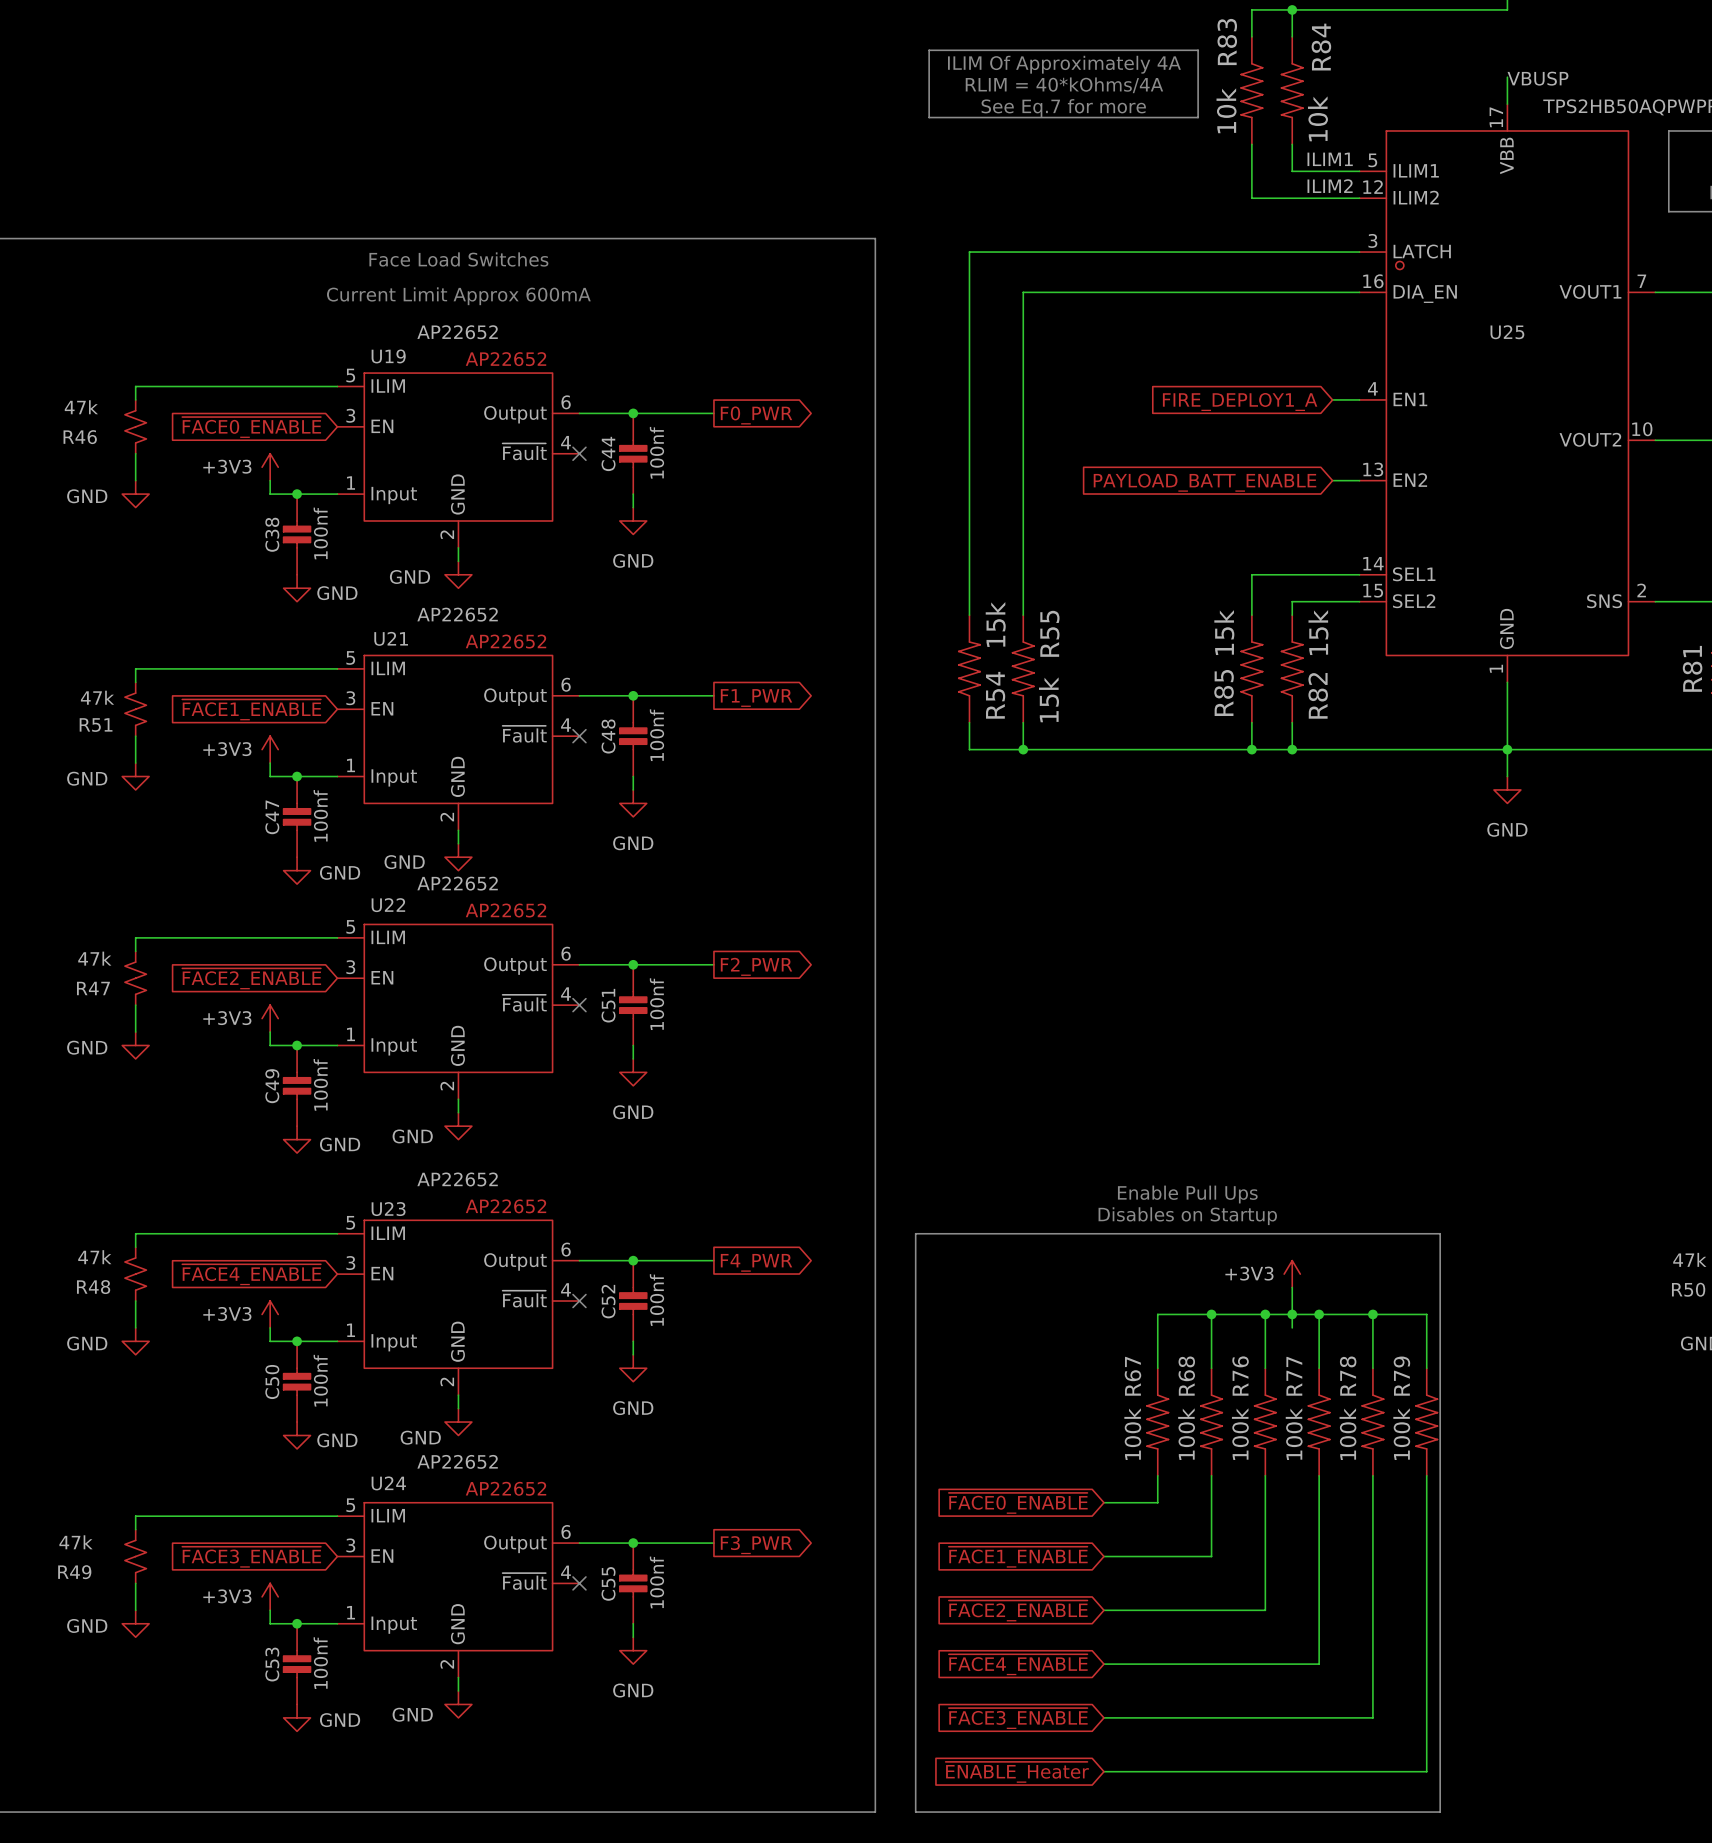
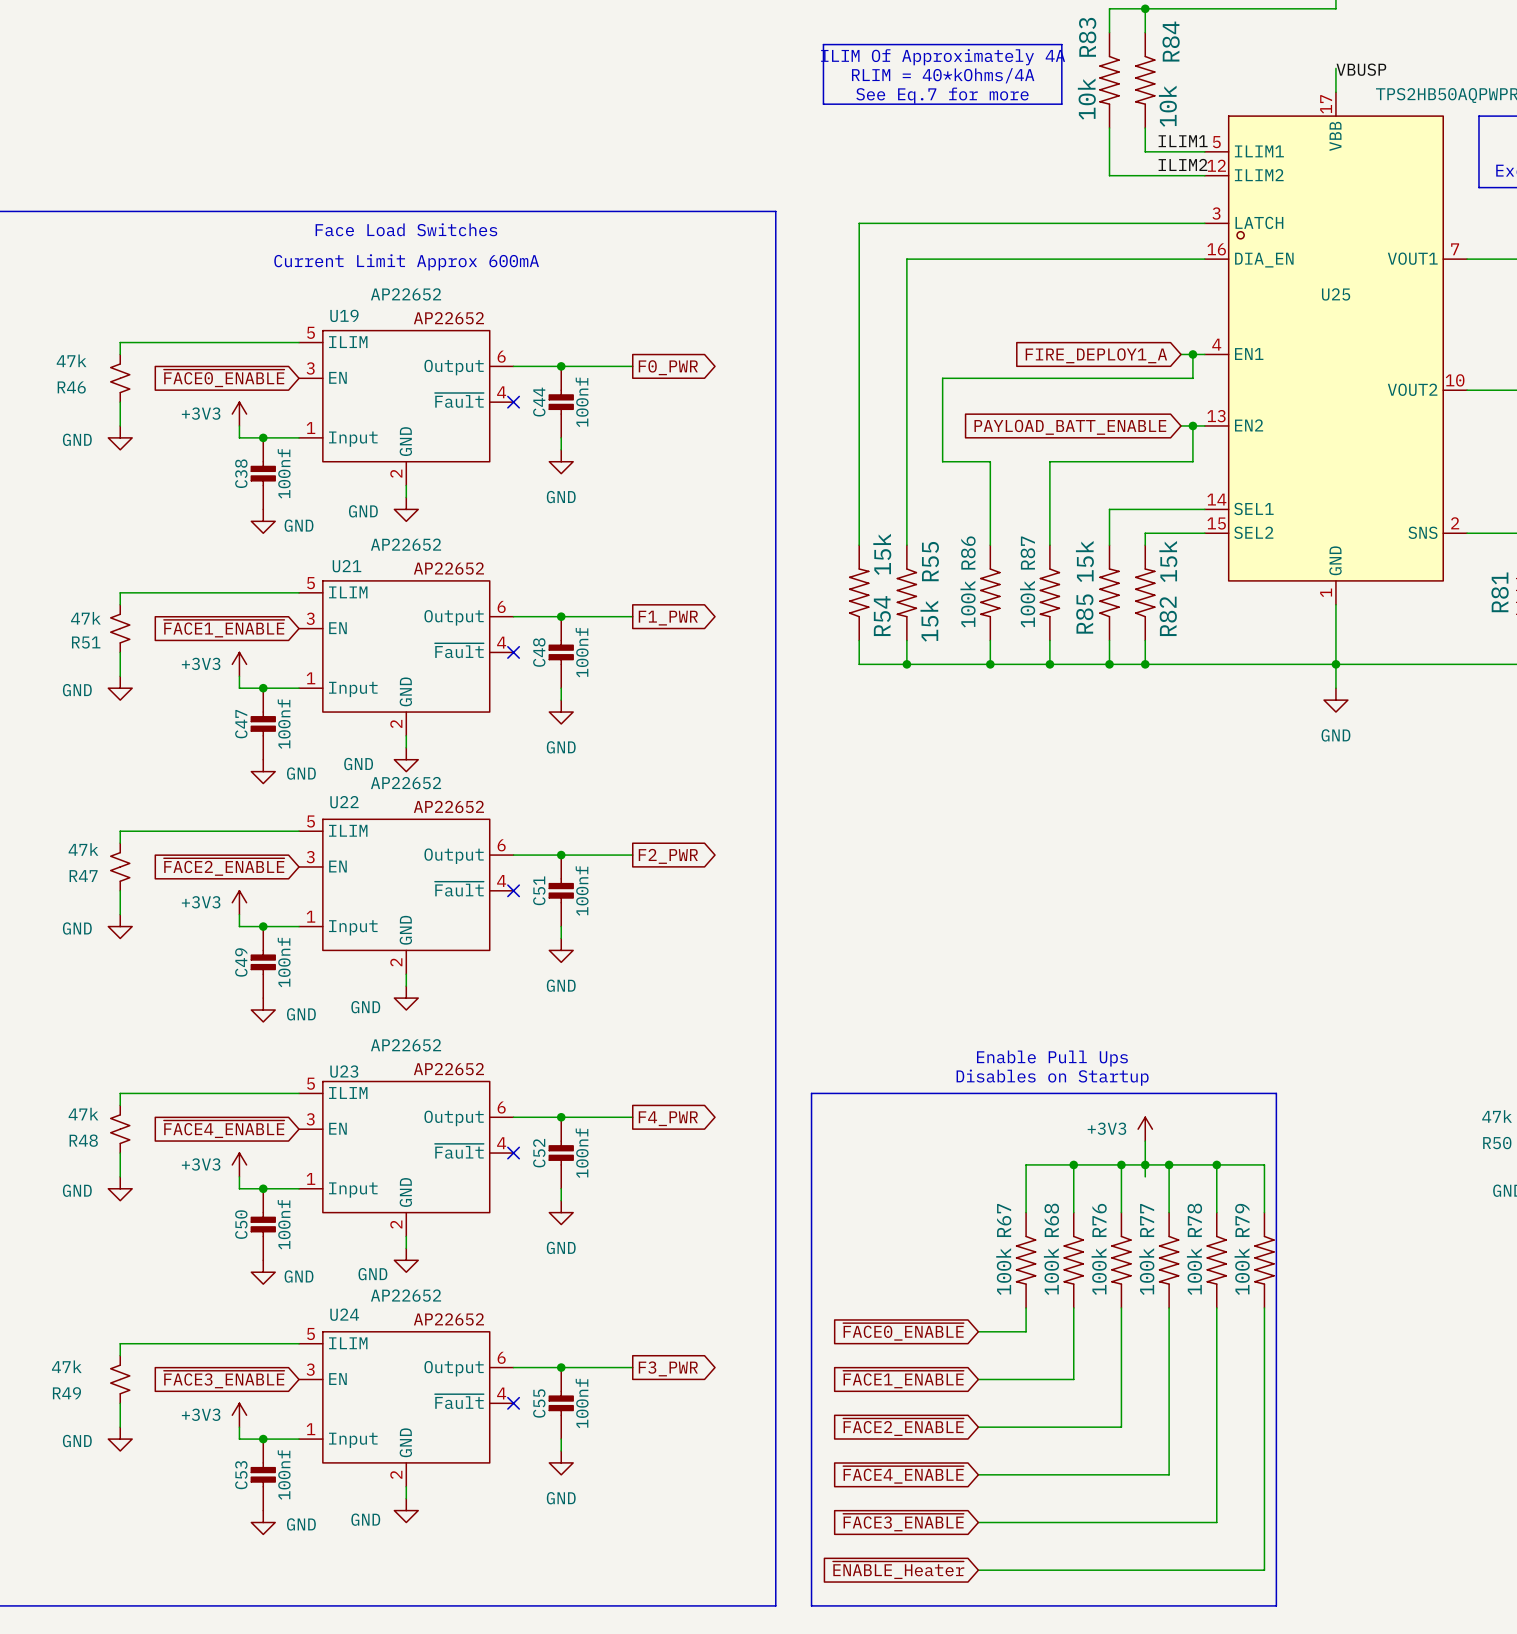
wire: none -> (1192, 354) (1192, 378) (942, 378) (942, 461) (990, 461) (990, 545)
junction: none -> (1192, 354)
wire: none -> (1192, 425) (1192, 461) (1049, 461) (1049, 545)
junction: none -> (1192, 425)
R86: none -> 100k (990, 592)
R87: none -> 100k (1049, 592)
wire: none -> (990, 640) (990, 664)
wire: none -> (1049, 640) (1049, 664)
junction: none -> (990, 664)
junction: none -> (1049, 664)

